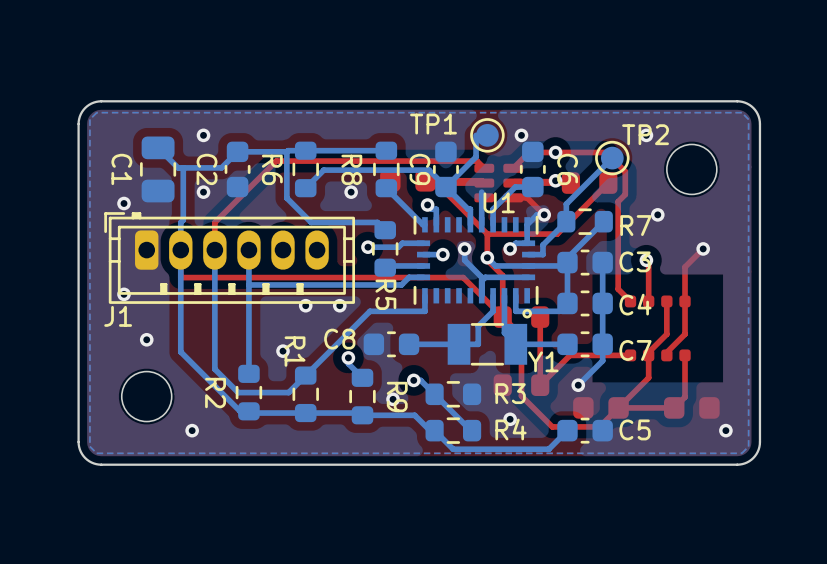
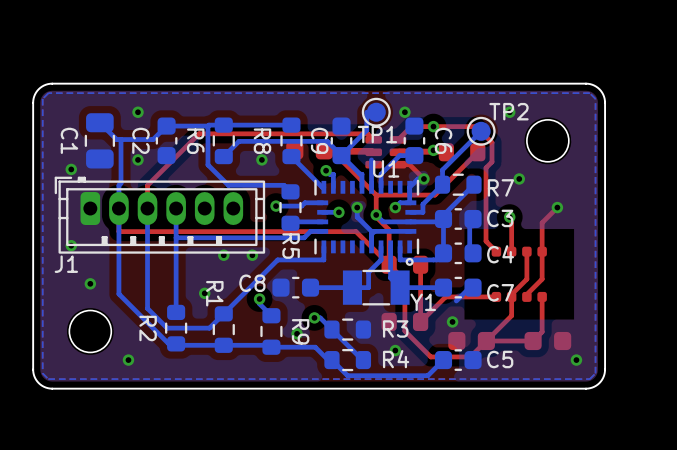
text: TP1 (433, 124) -> none
TP1 name: none -> TP1 (377, 134)
bottom track: (602, 262) (602, 360) (578, 385) -> (473, 219) (469, 222) (469, 253)
bottom track: none -> (469, 287) (456, 300)

